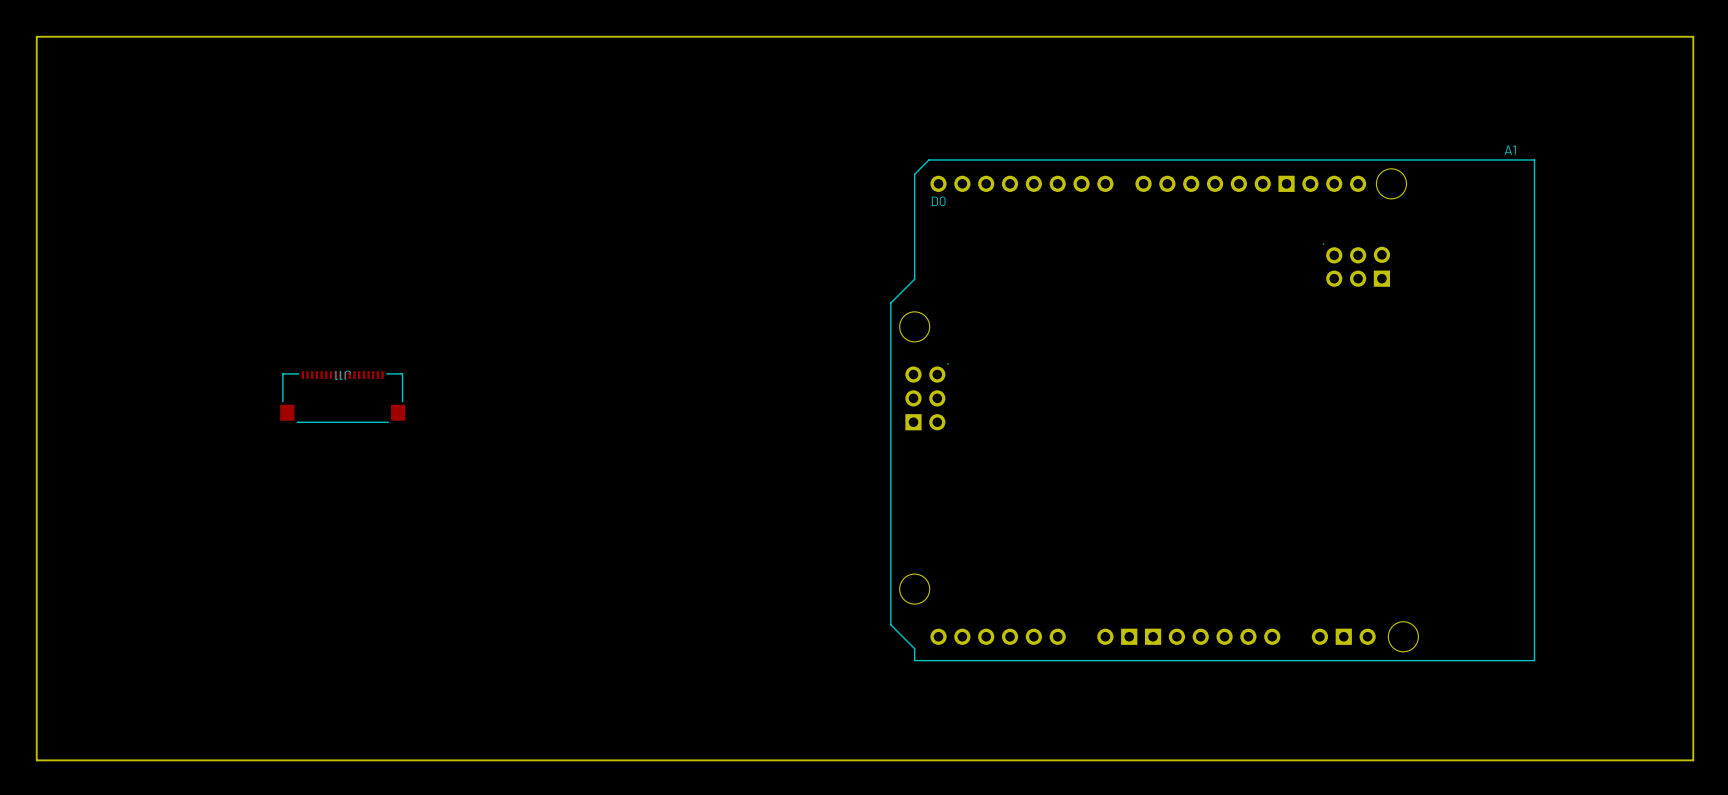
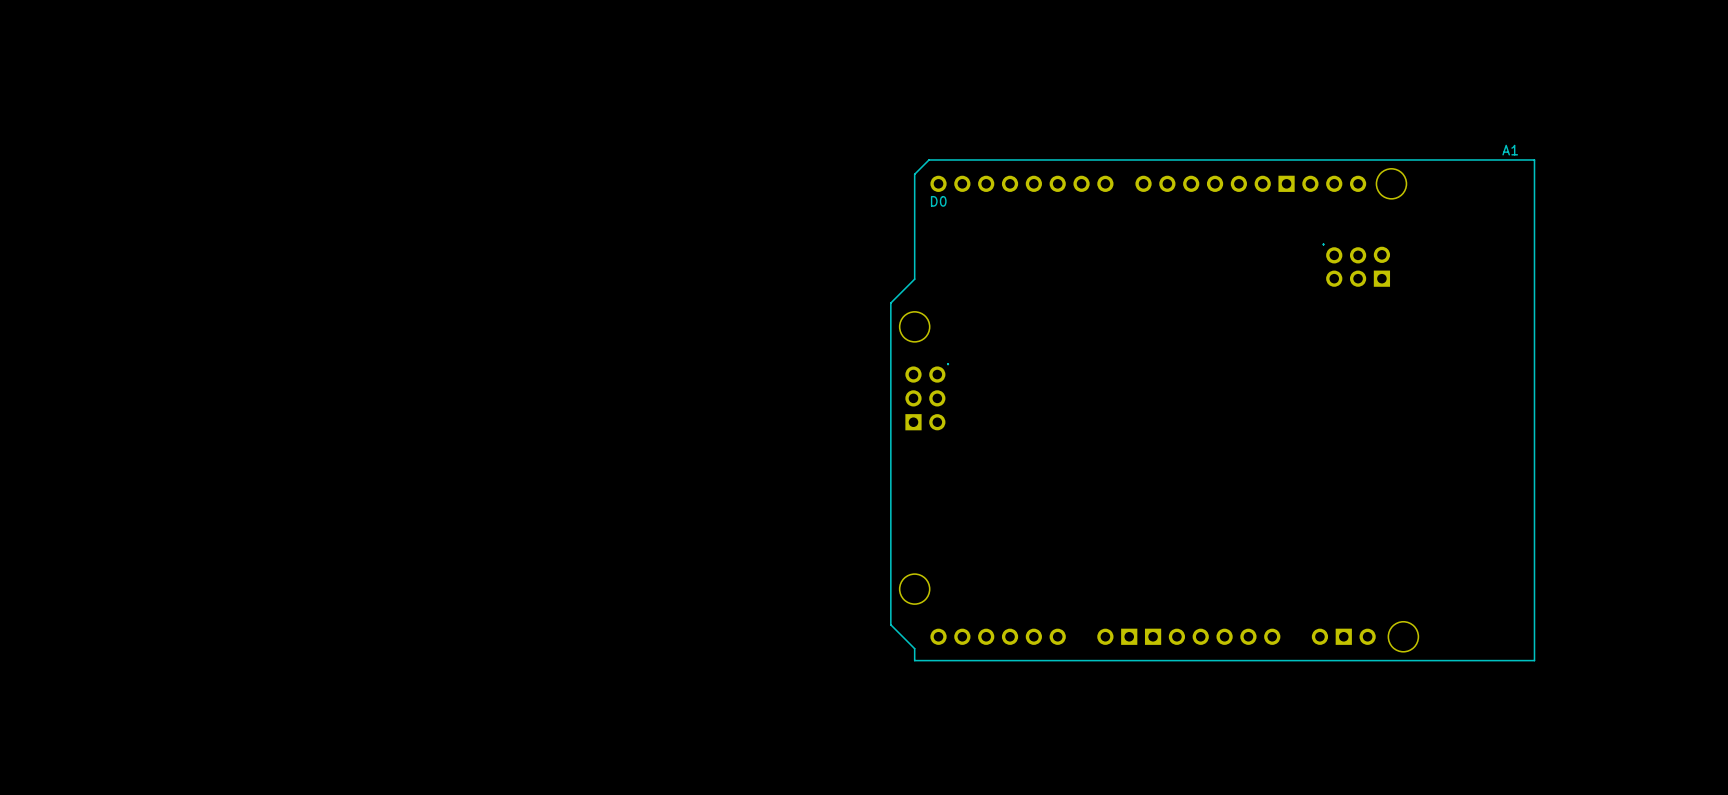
board edge: (36, 36) (1693, 36) (1693, 760) (36, 760) (36, 36) -> none
J11: (342, 397) -> none

